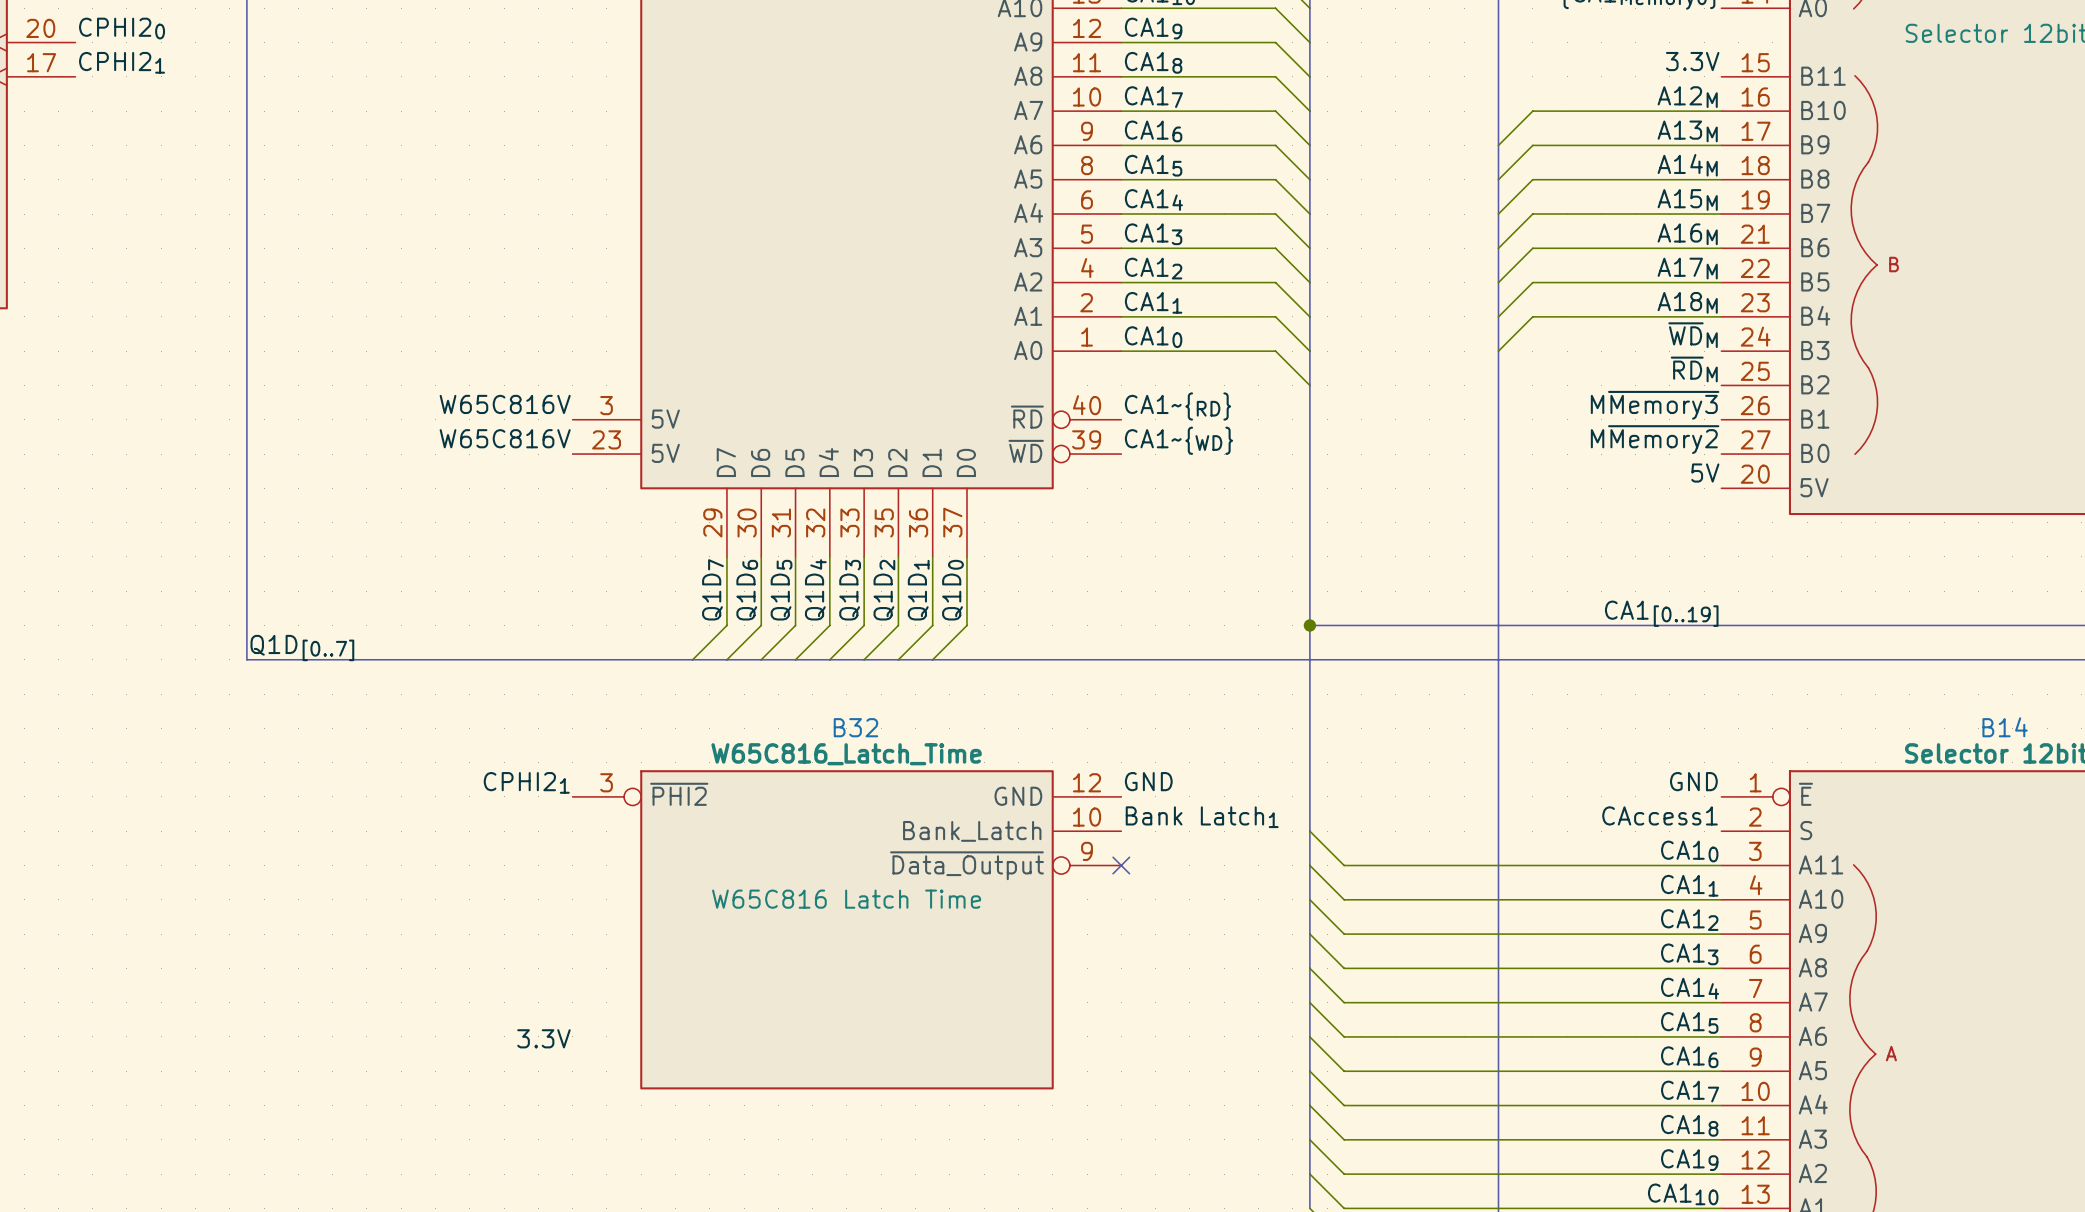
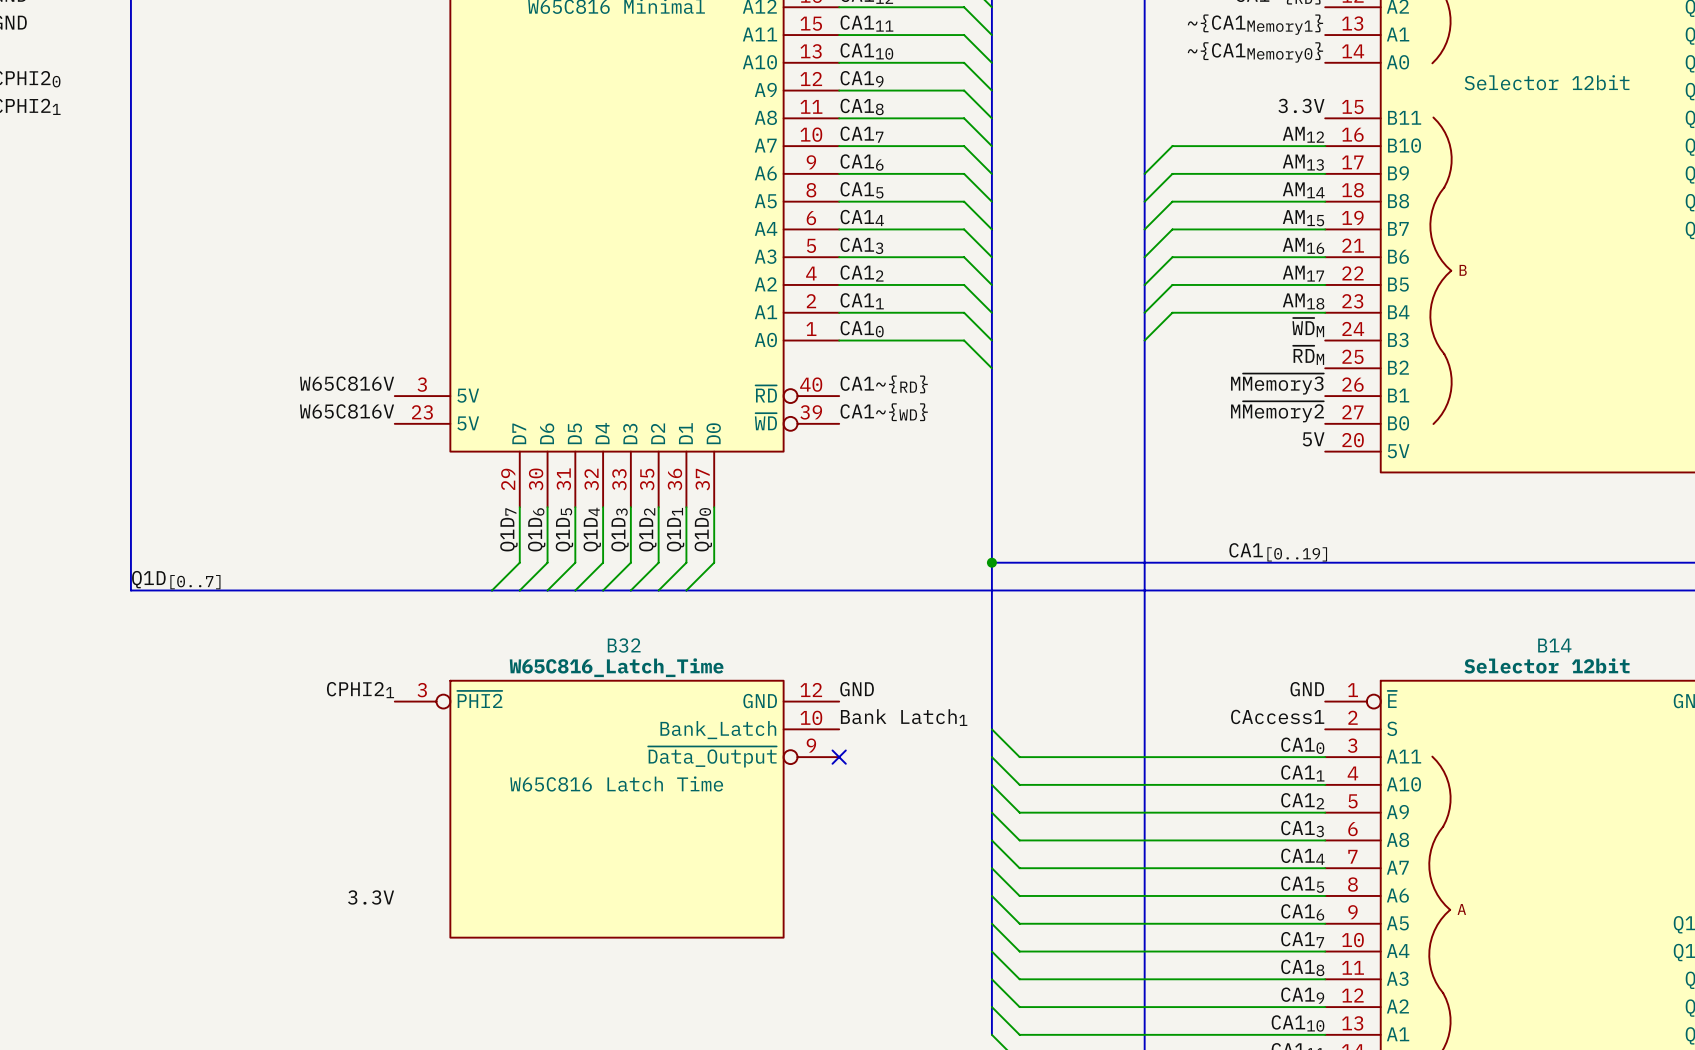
label: A12M (1687, 97) -> AM12 (1303, 134)
label: A13M (1687, 131) -> AM13 (1303, 162)
label: A14M (1687, 165) -> AM14 (1303, 190)
label: A15M (1687, 199) -> AM15 (1303, 218)
label: A16M (1687, 234) -> AM16 (1303, 245)
label: A17M (1687, 268) -> AM17 (1303, 273)
label: A18M (1687, 302) -> AM18 (1303, 301)

